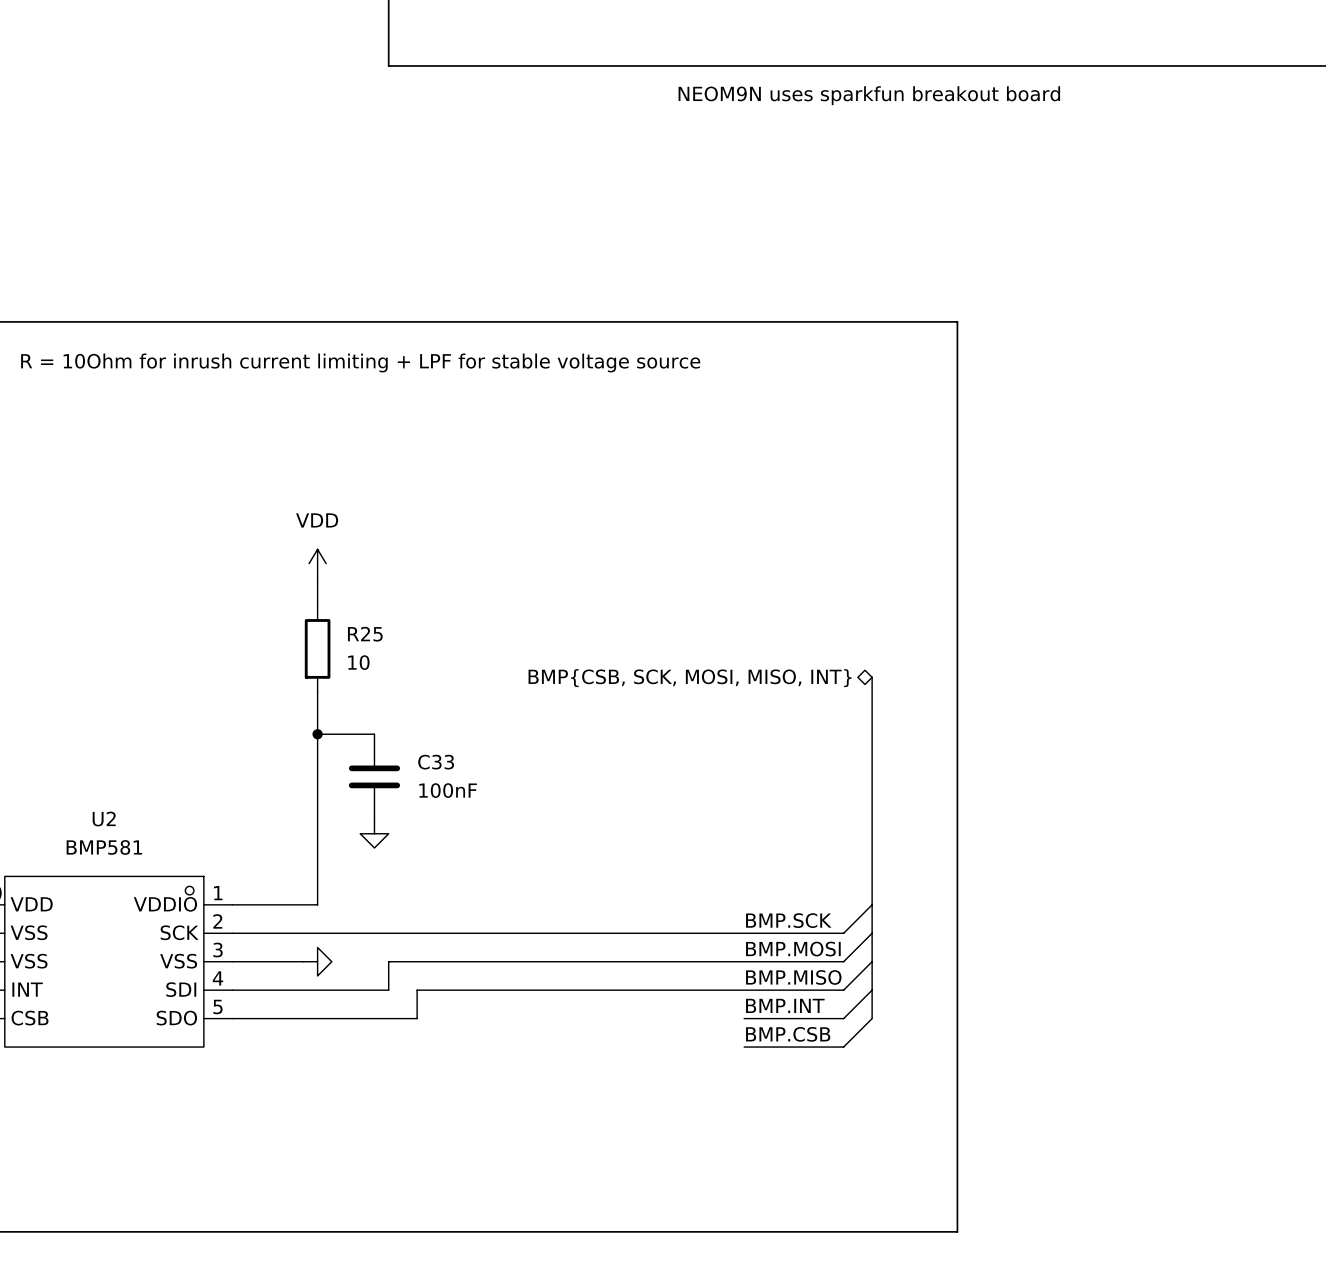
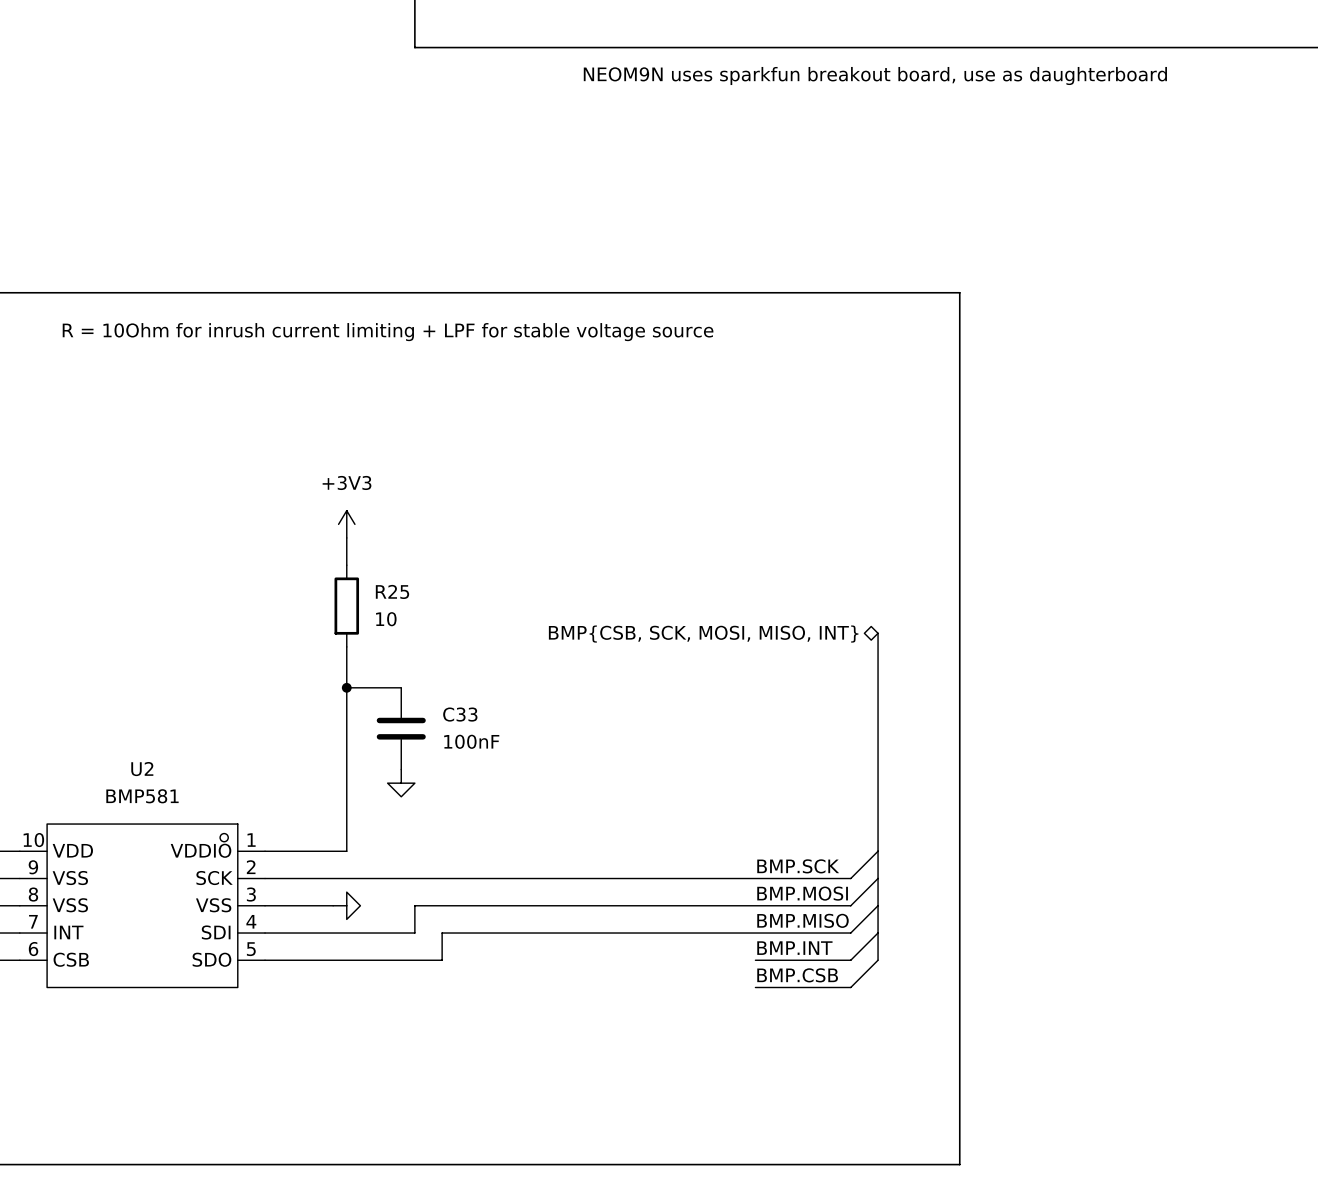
text: NEOM9N uses sparkfun breakout board (869, 95) -> NEOM9N uses sparkfun breakout board, use as daughterboard (875, 76)
power symbol: VDD (317, 563) -> +3V3 (346, 524)

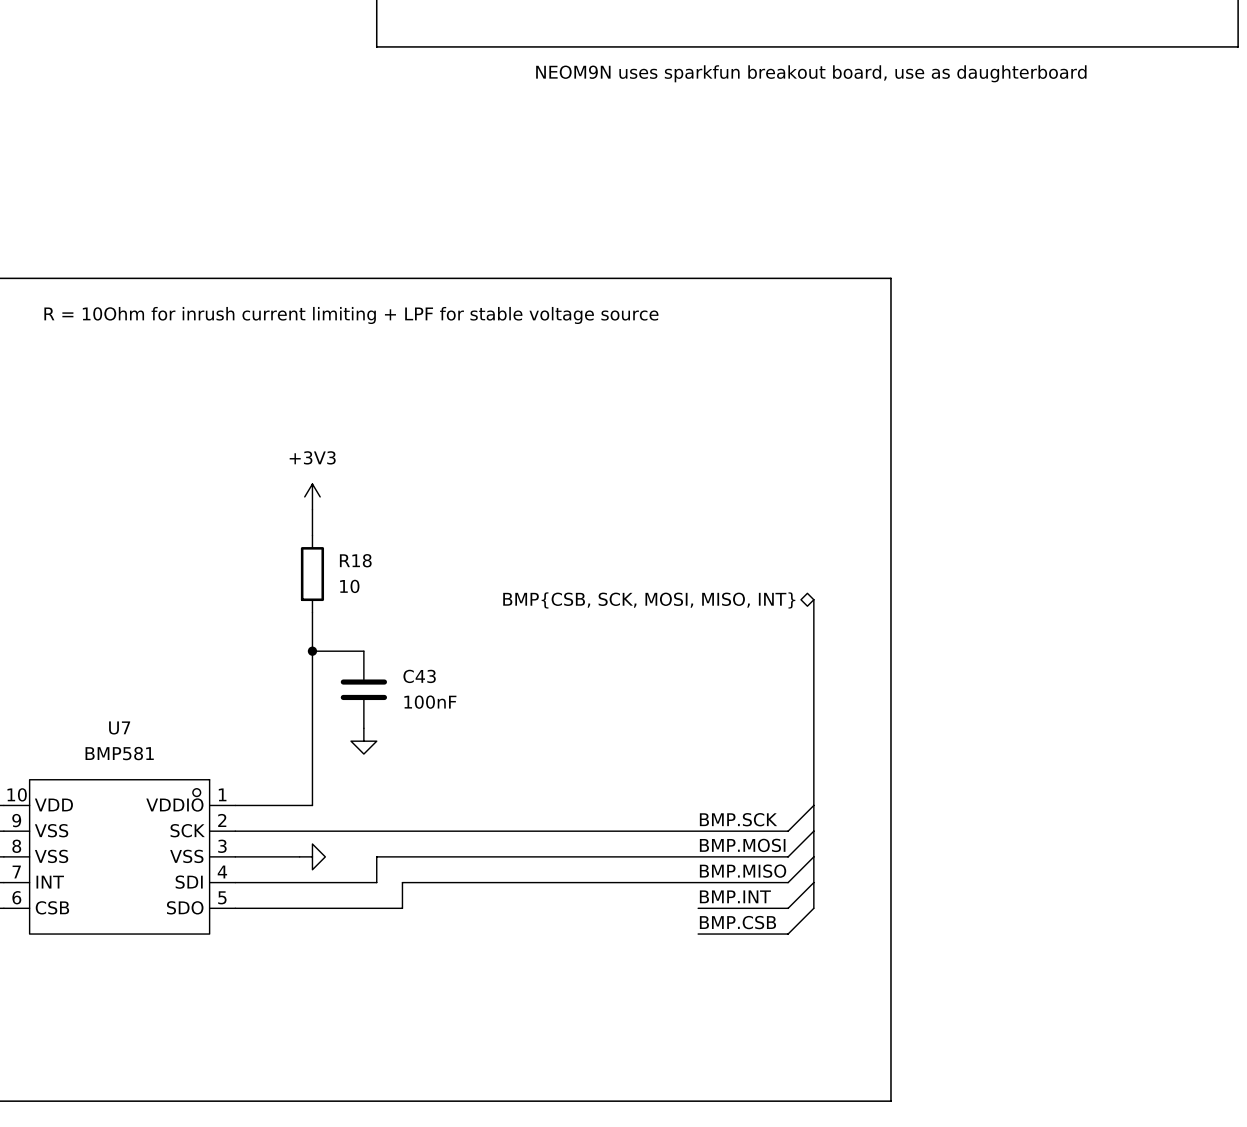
R25 name: R25 (392, 591) -> R18 (355, 560)
C33 name: C33 (460, 714) -> C43 (419, 676)
U2 name: U2 (142, 769) -> U7 (119, 727)

